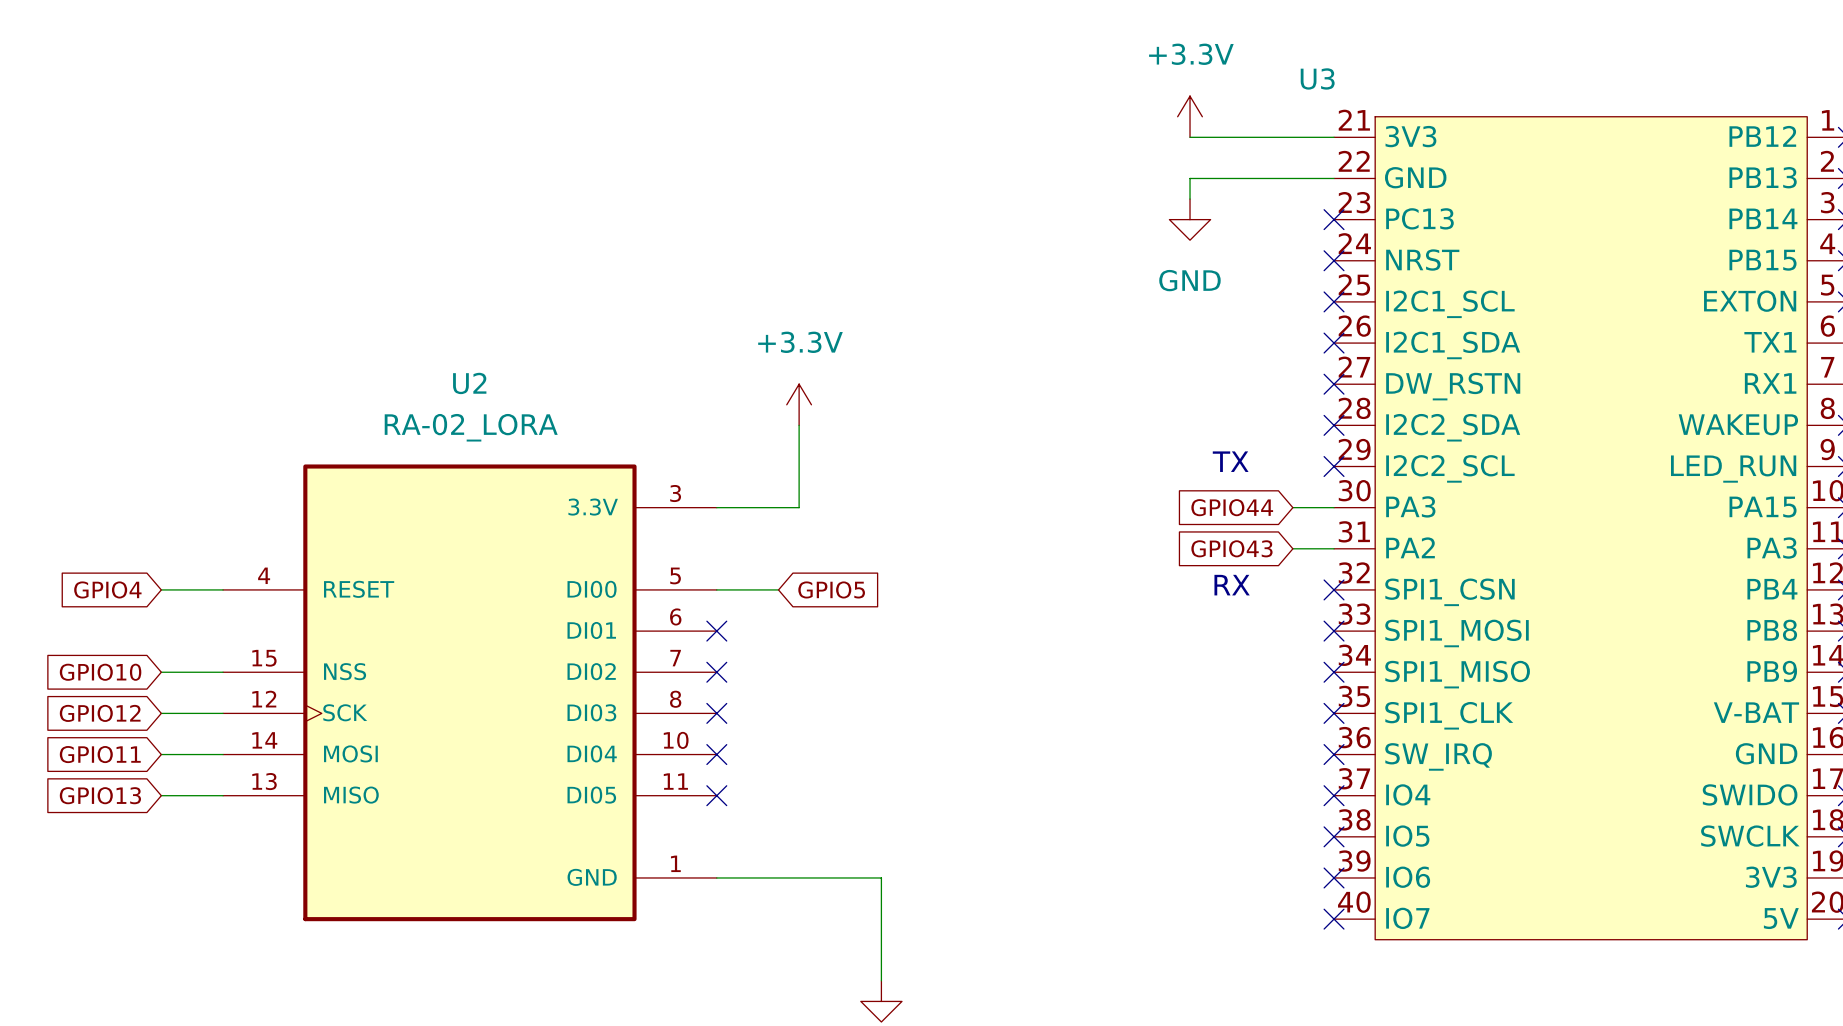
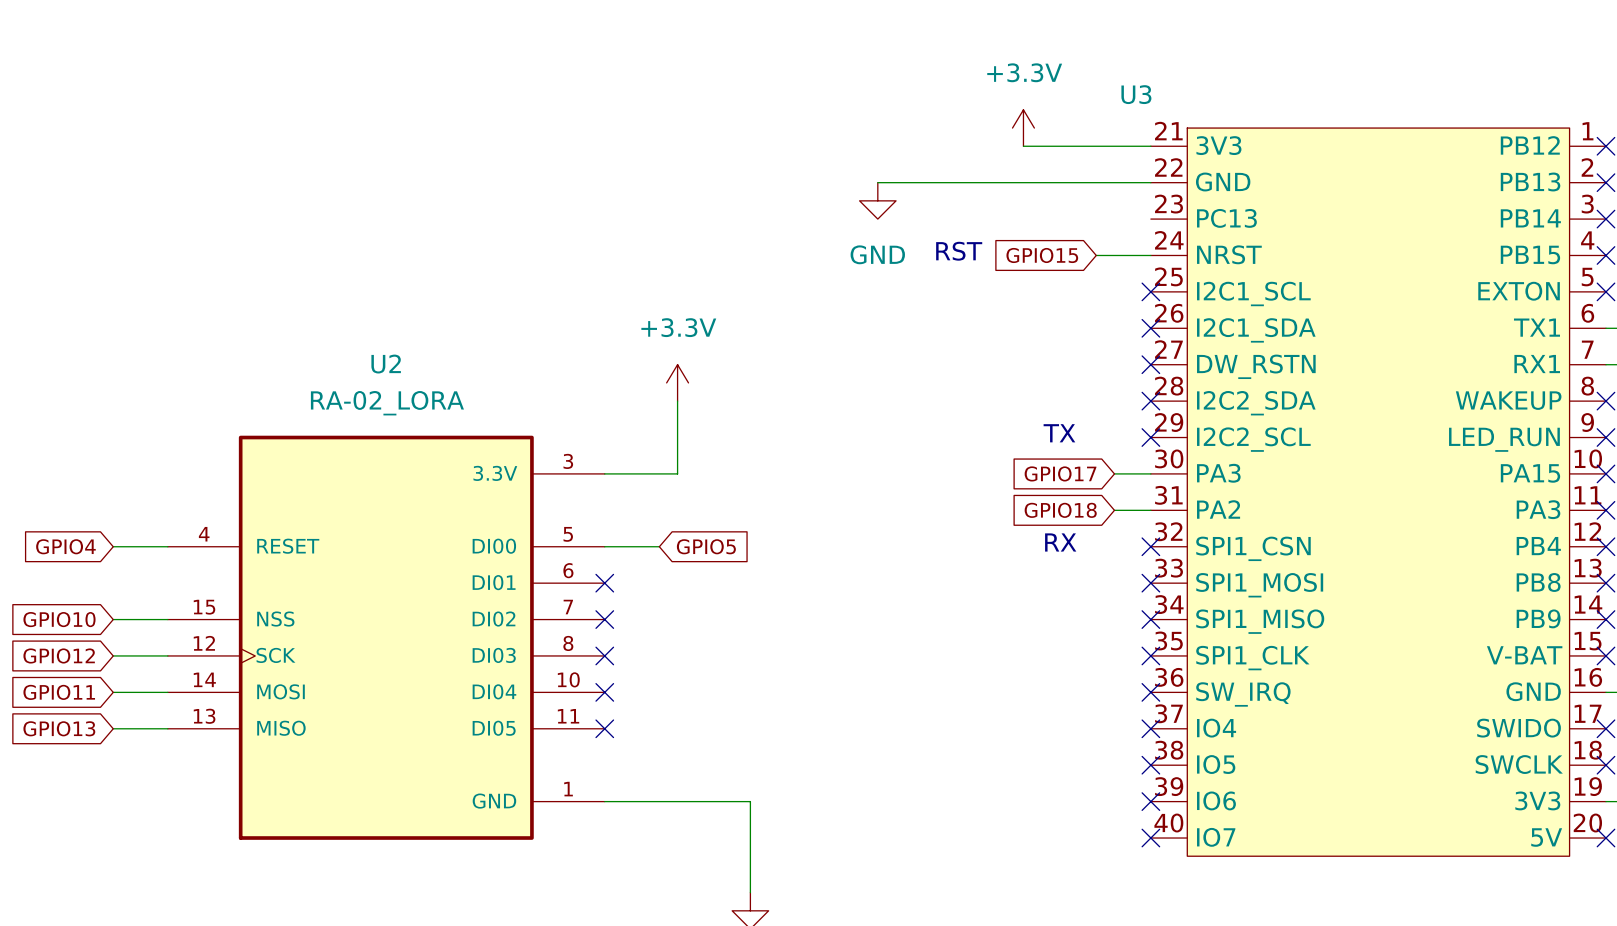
wire: (1190, 178) (1190, 199) -> (1023, 182) (877, 182)
power symbol position: GND (1190, 219) -> GND (877, 200)
no-connect mark: (1334, 219) -> none
text: none -> RST (959, 251)
global label: none -> GPIO15 (1042, 255)
wire: none -> (1096, 255) (1150, 255)
no-connect mark: (1334, 260) -> none
global label: GPIO44 (1232, 507) -> GPIO17 (1060, 473)
global label: GPIO43 (1231, 548) -> GPIO18 (1060, 510)

